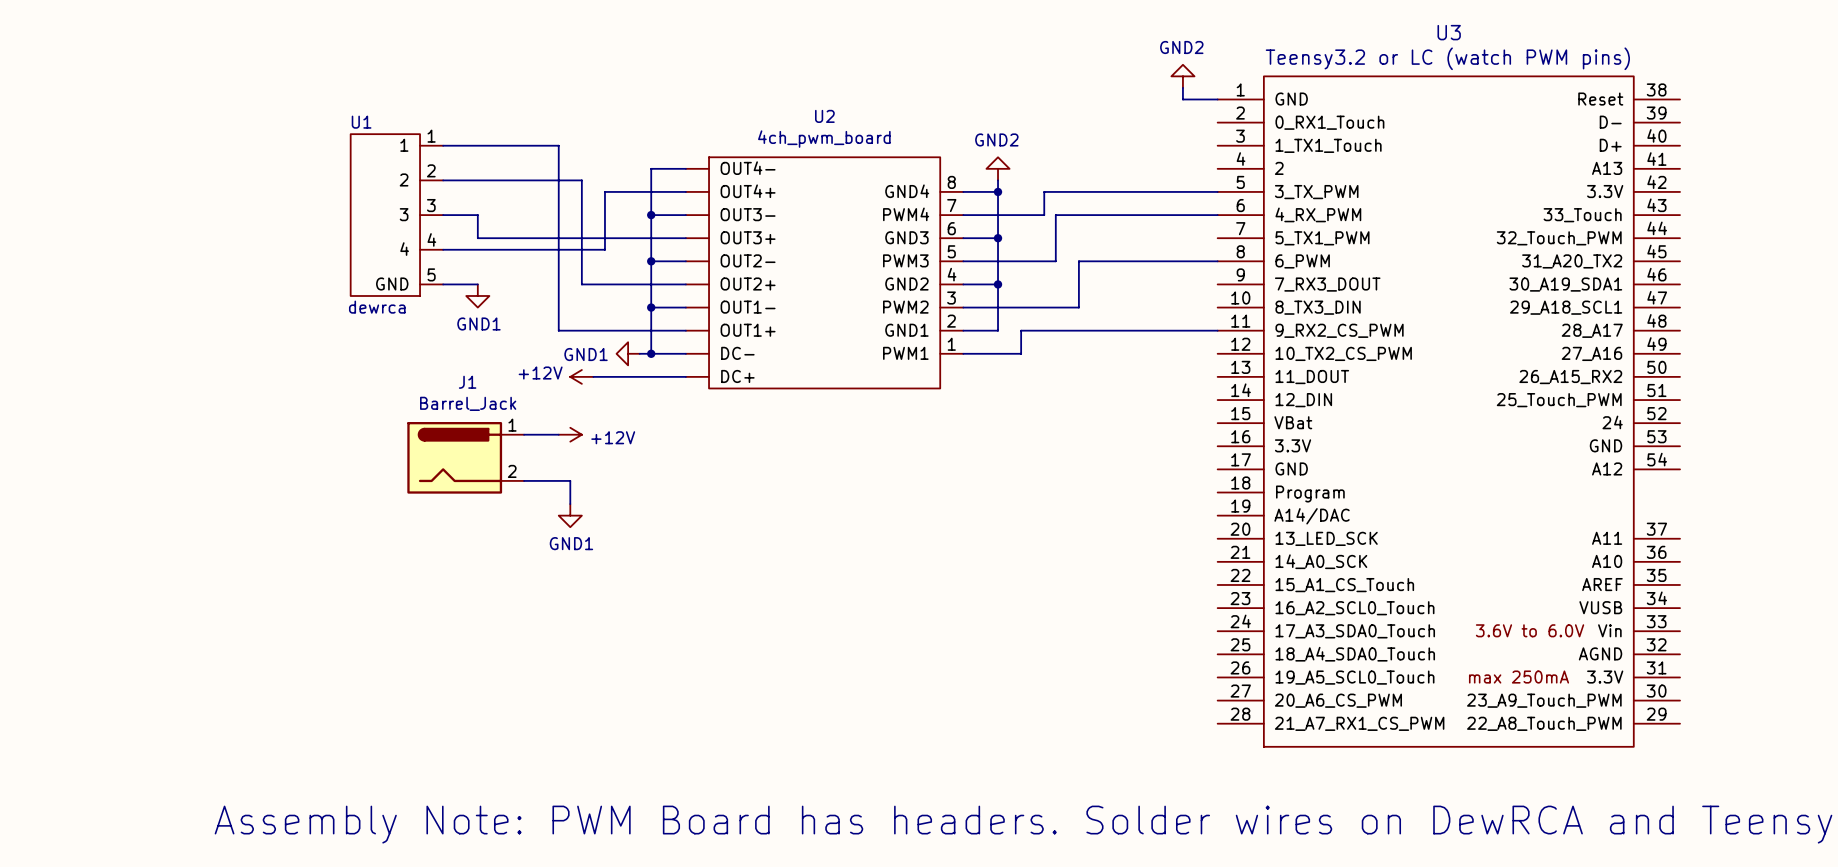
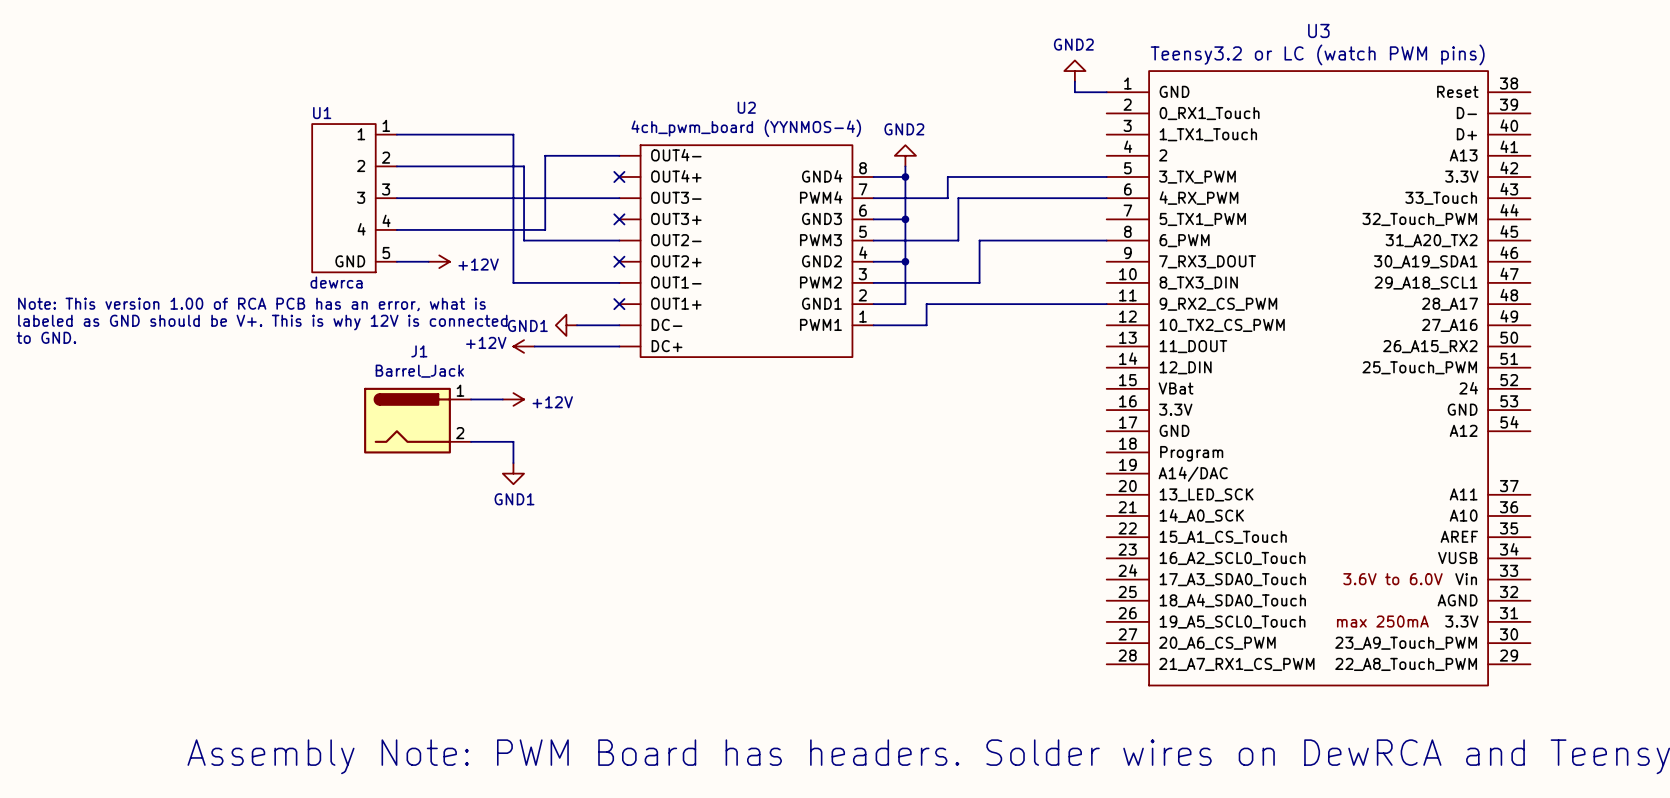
U2 value: 4ch_pwm_board (824, 139) -> 4ch_pwm_board (YYNMOS-4) (746, 128)
wire: (558, 145) (558, 330) (685, 330) -> (502, 134) (513, 134) (513, 282) (587, 282)
wire: (651, 168) (651, 353) -> none
wire: (604, 191) (685, 191) -> (545, 176) (545, 155) (587, 155)
no-connect mark: none -> (619, 176)
wire: (477, 215) (477, 238) (685, 238) -> (428, 198) (587, 198)
junction: (651, 215) -> none
no-connect mark: none -> (619, 219)
wire: (581, 261) (581, 284) (685, 284) -> (524, 240) (587, 240)
junction: (651, 261) -> none
power symbol: none -> +12V (439, 261)
no-connect mark: none -> (619, 261)
power symbol: GND1 (477, 295) -> none
junction: (651, 307) -> none
no-connect mark: none -> (619, 304)
text: none -> Note: This version 1.00 of RCA PCB has an error, what is (251, 304)
text: none -> labeled as GND should be V+. This is why 12V is connected (262, 322)
junction: (651, 353) -> none
text: none -> to GND. (46, 337)

